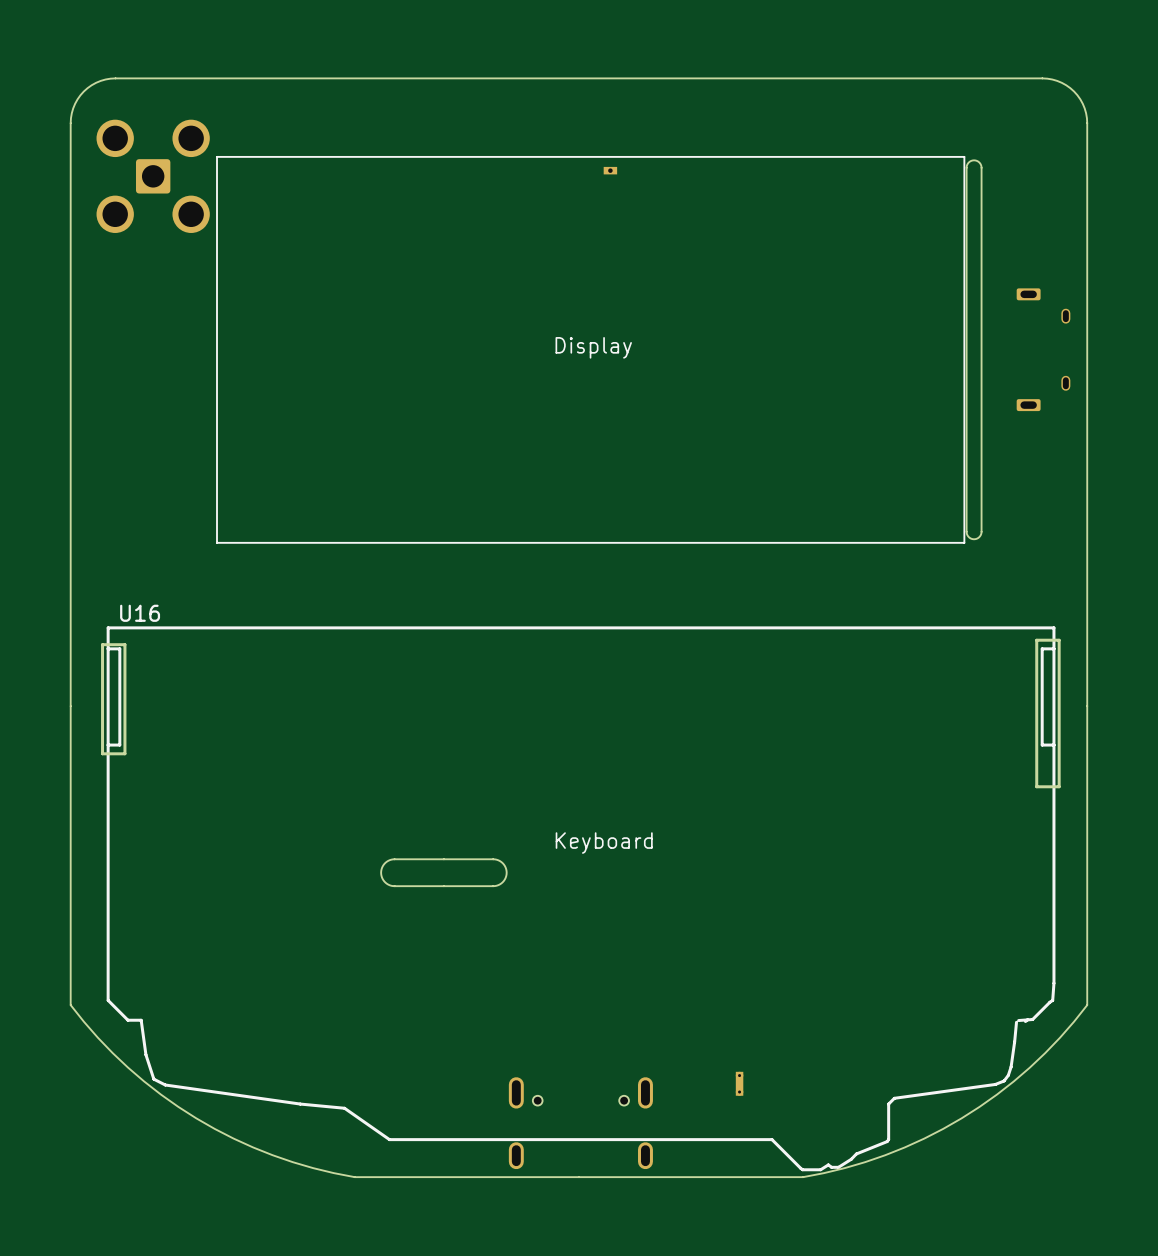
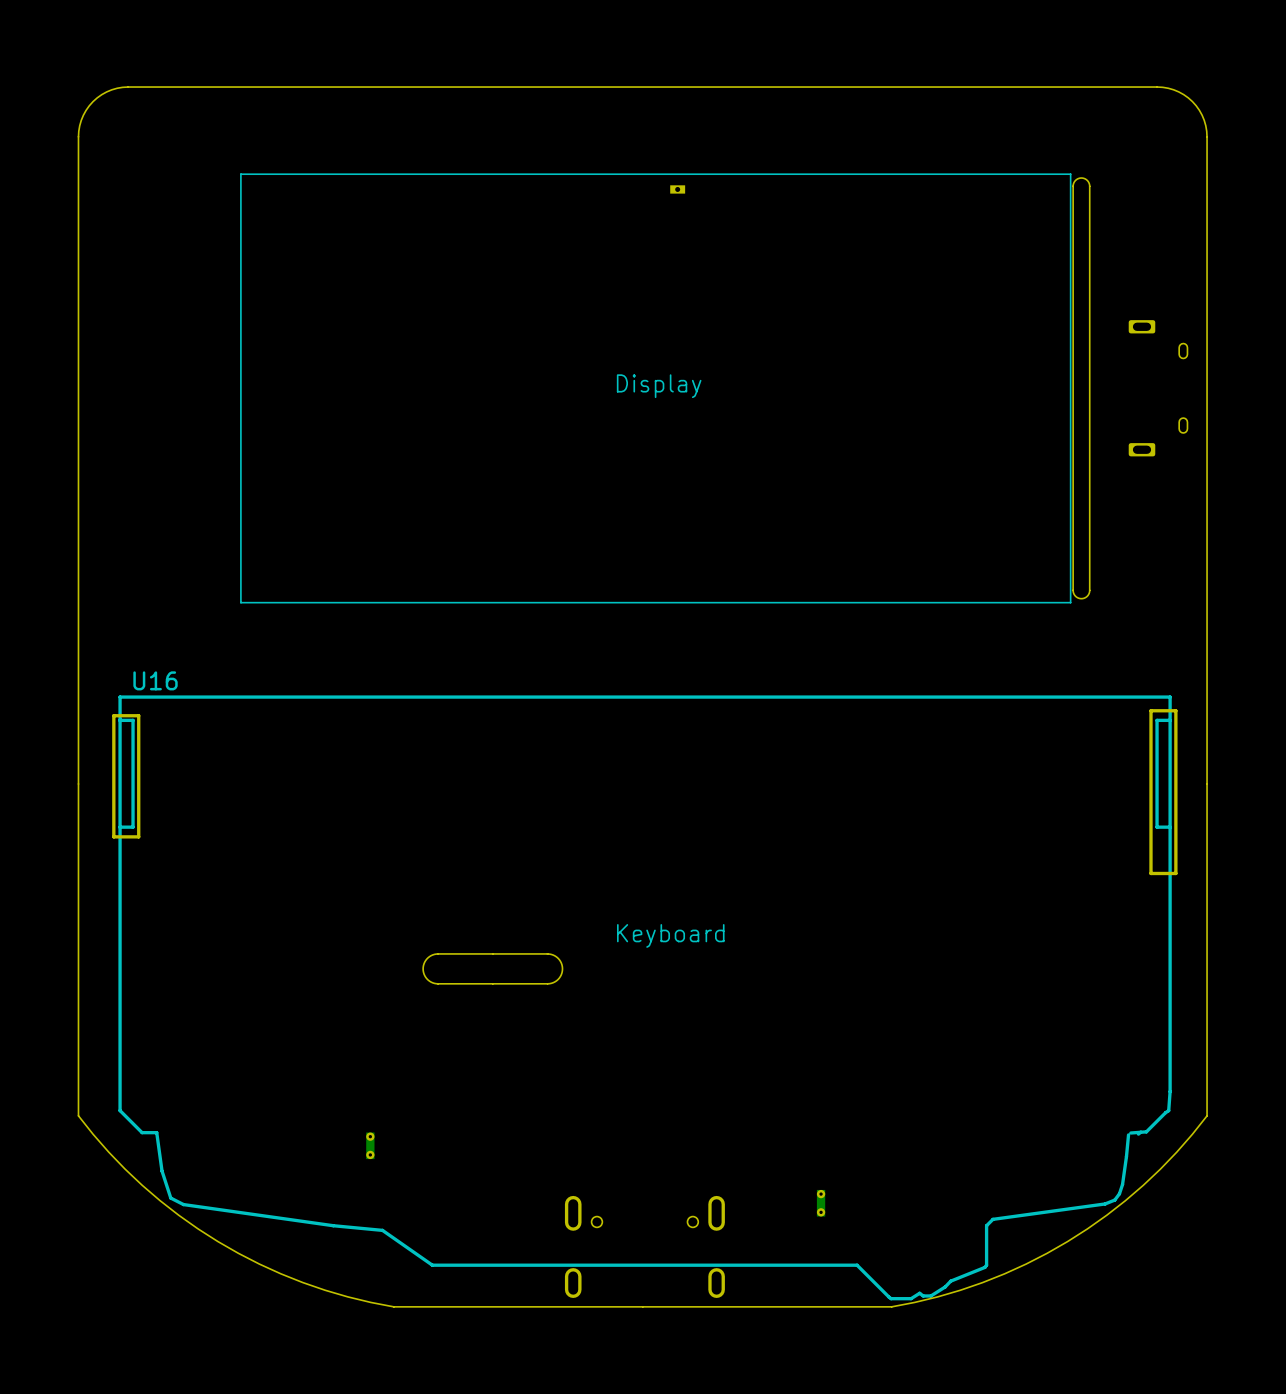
part: (153, 176) -> none
part: none -> (370, 1145)

